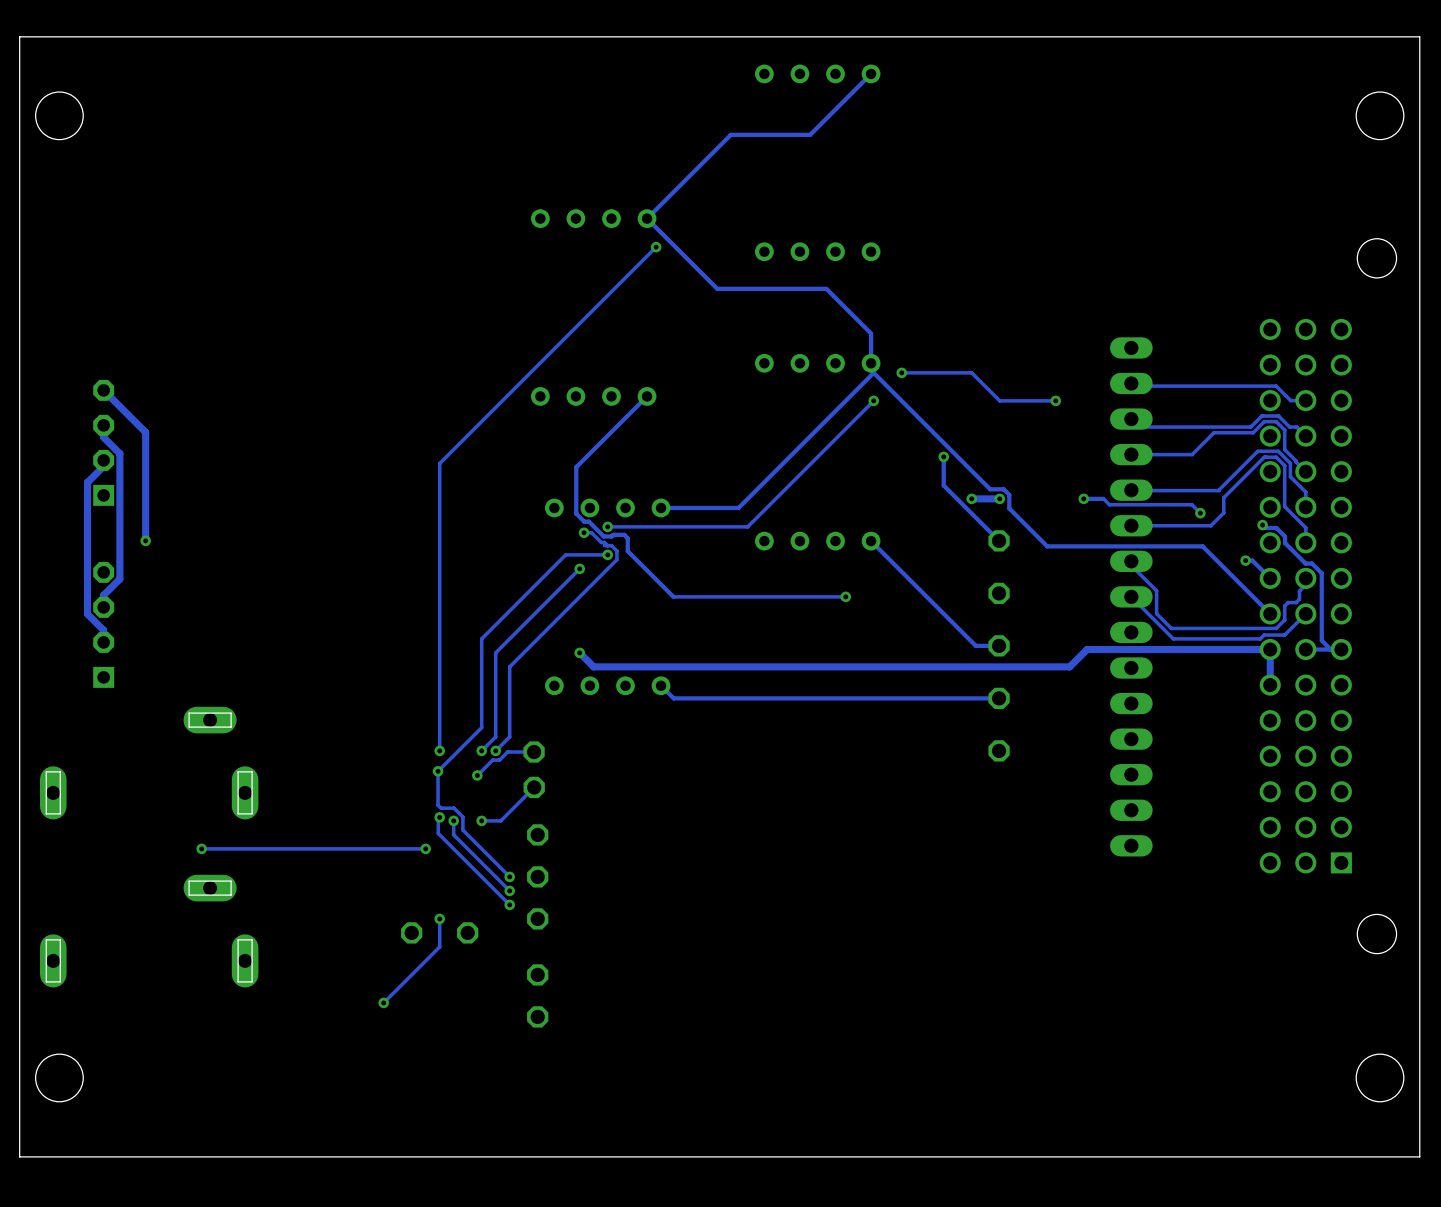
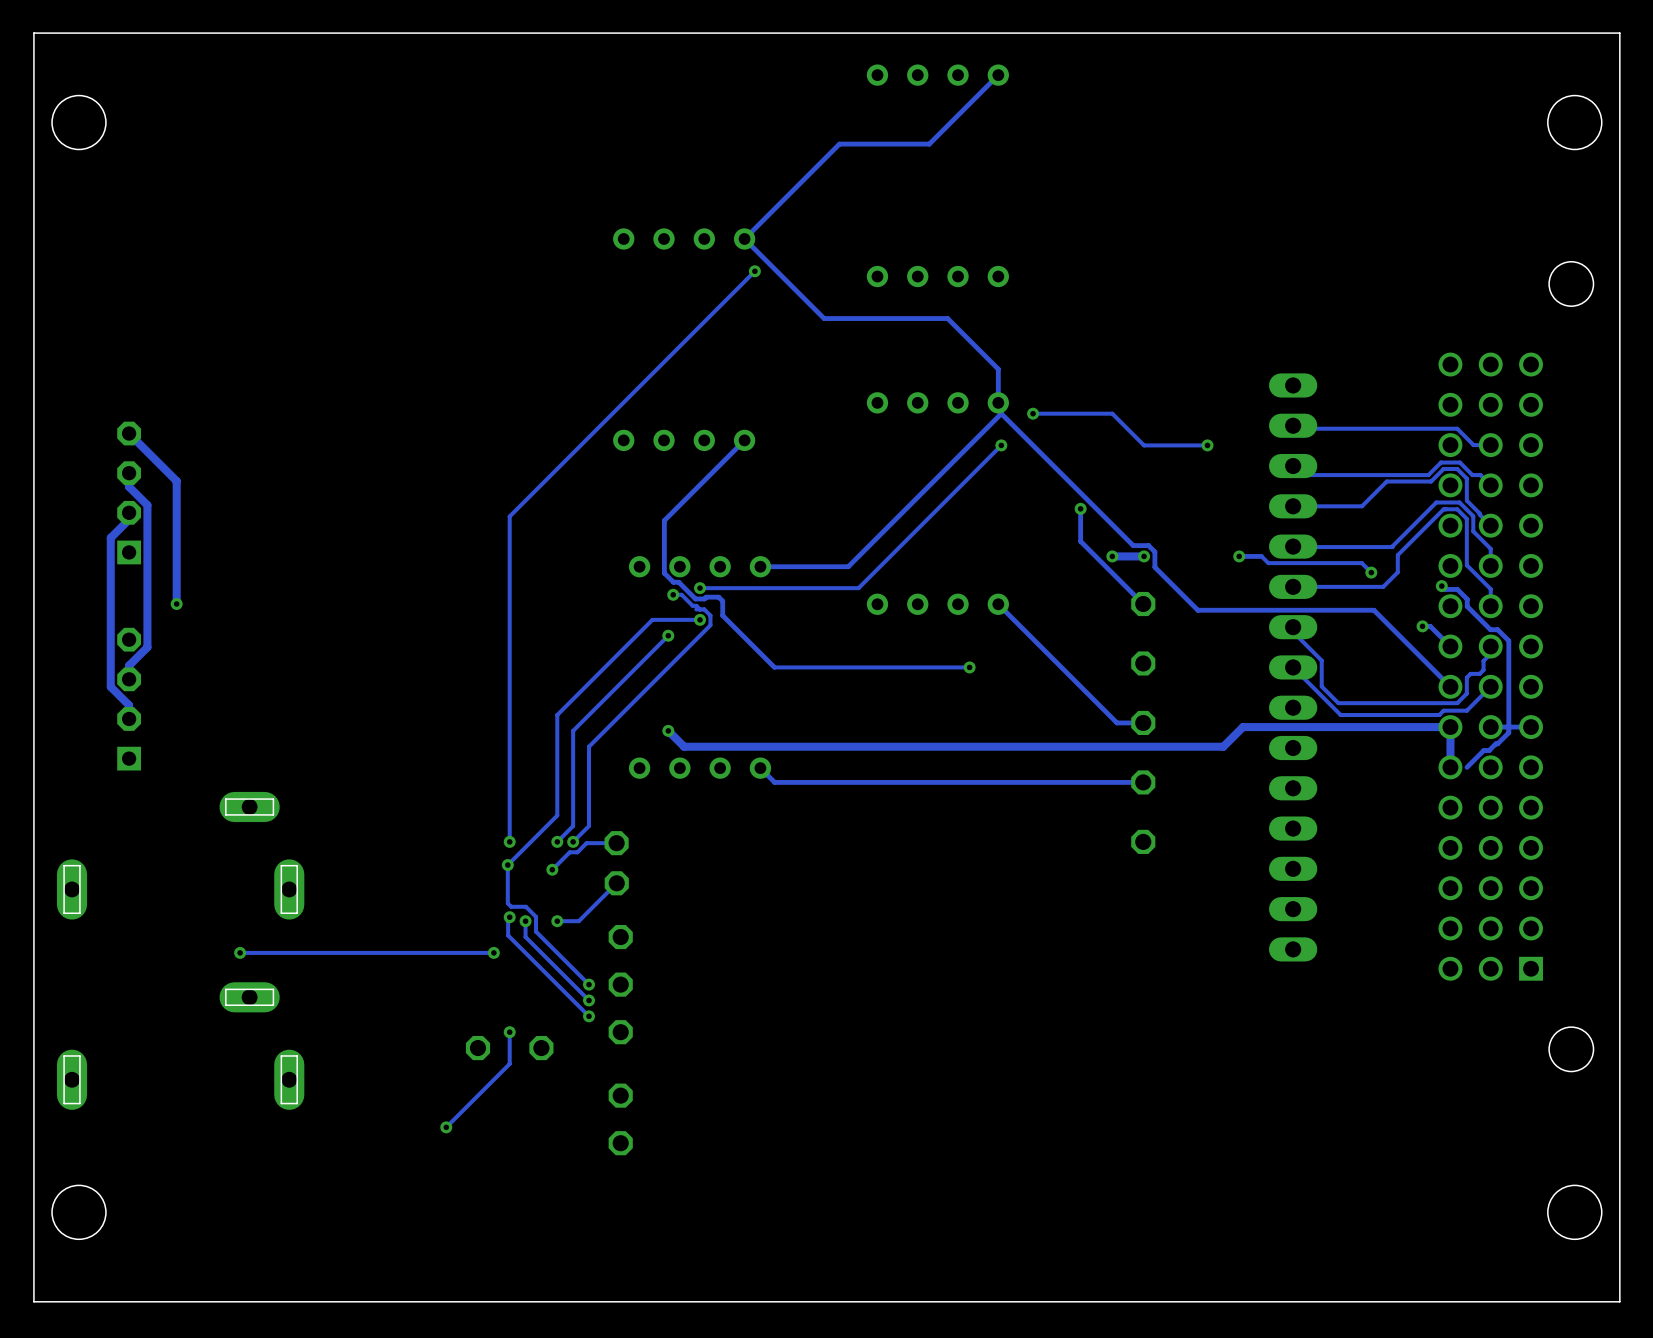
track: (1321, 640) (1330, 649) -> (1508, 716) (1508, 732) (1489, 750) (1483, 750) (1466, 767)

